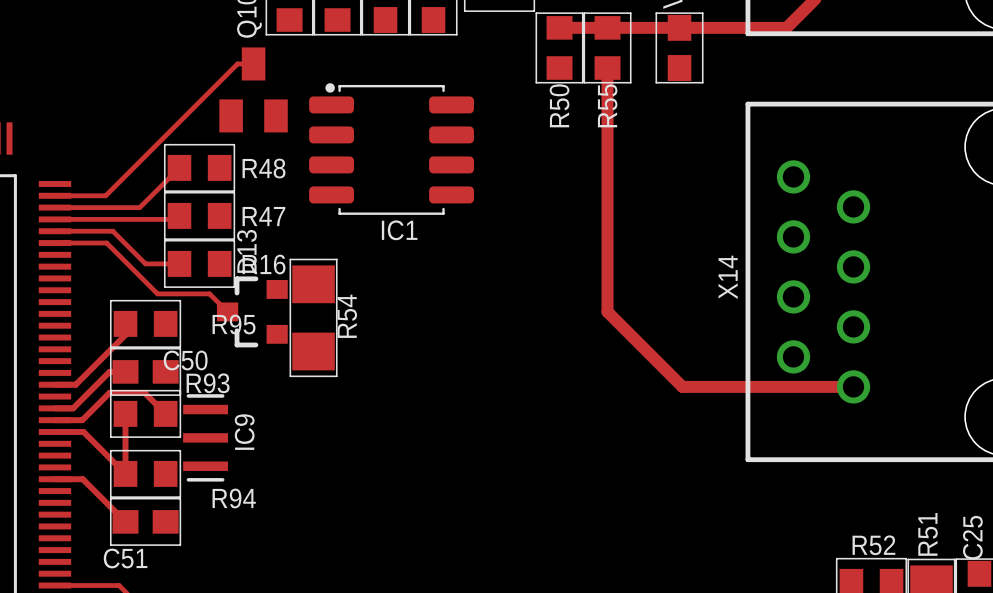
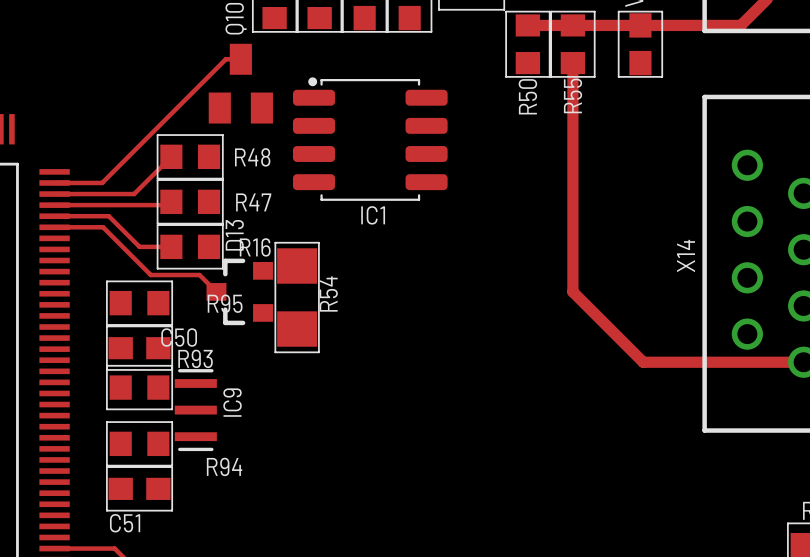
track: (125, 323) (125, 334) (75, 384) (54, 384) -> none
track: (125, 371) (109, 371) (73, 408) (54, 408) -> none
track: (125, 413) (125, 473) (83, 431) (54, 431) -> none
track: (165, 413) (144, 392) (109, 392) (82, 420) (54, 420) -> none
track: (54, 479) (82, 479) (125, 521) -> none

